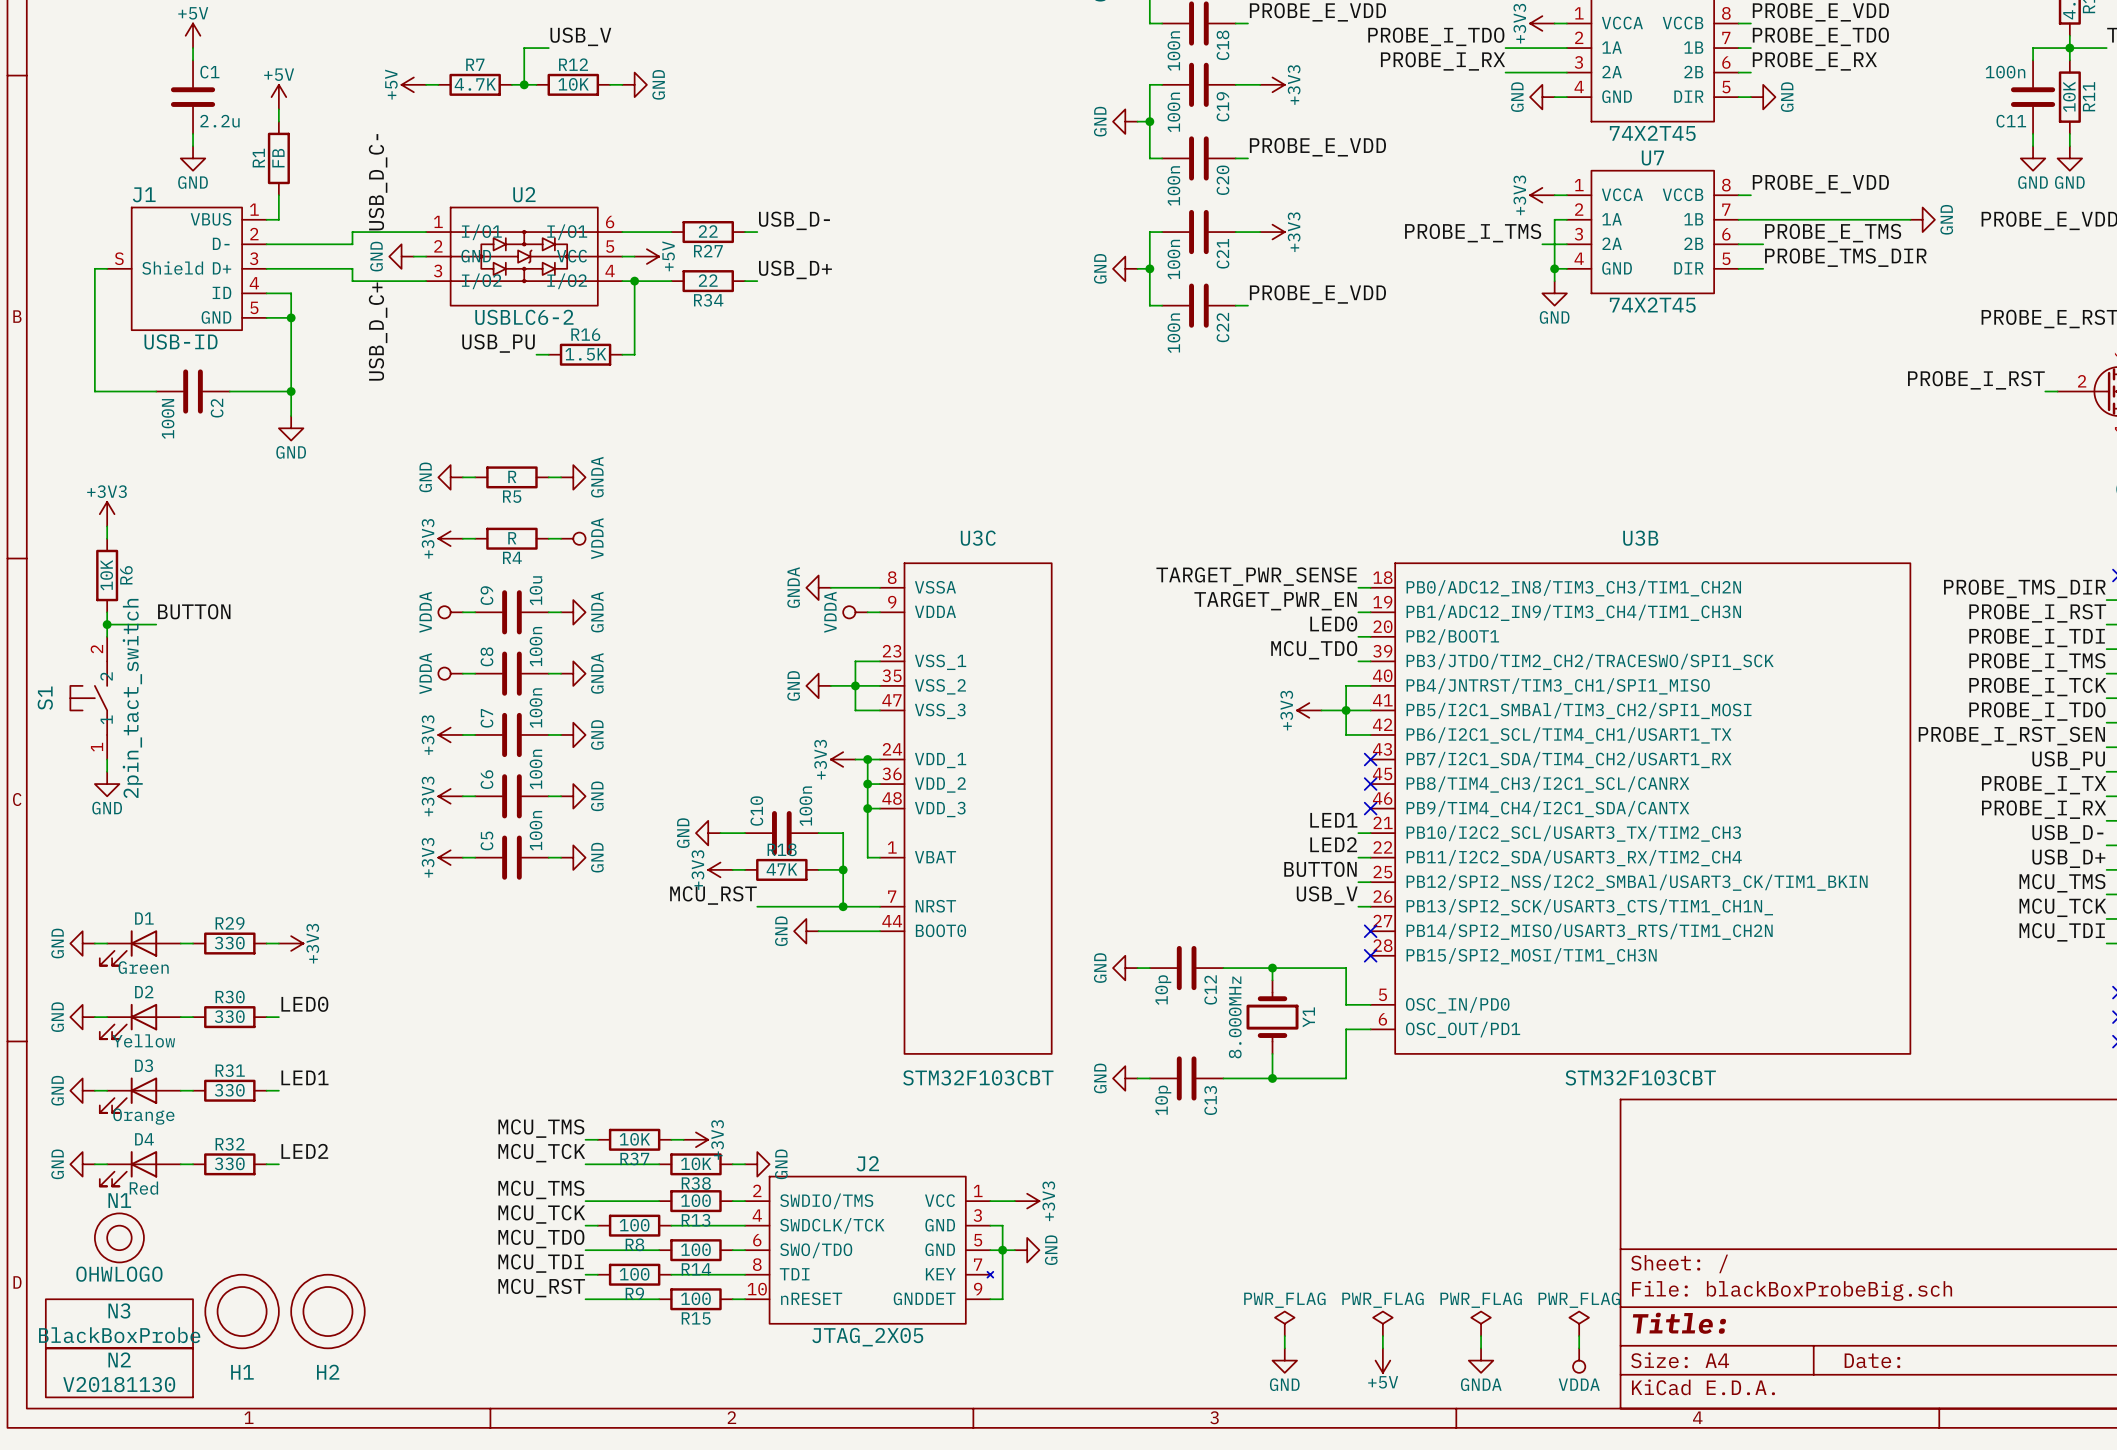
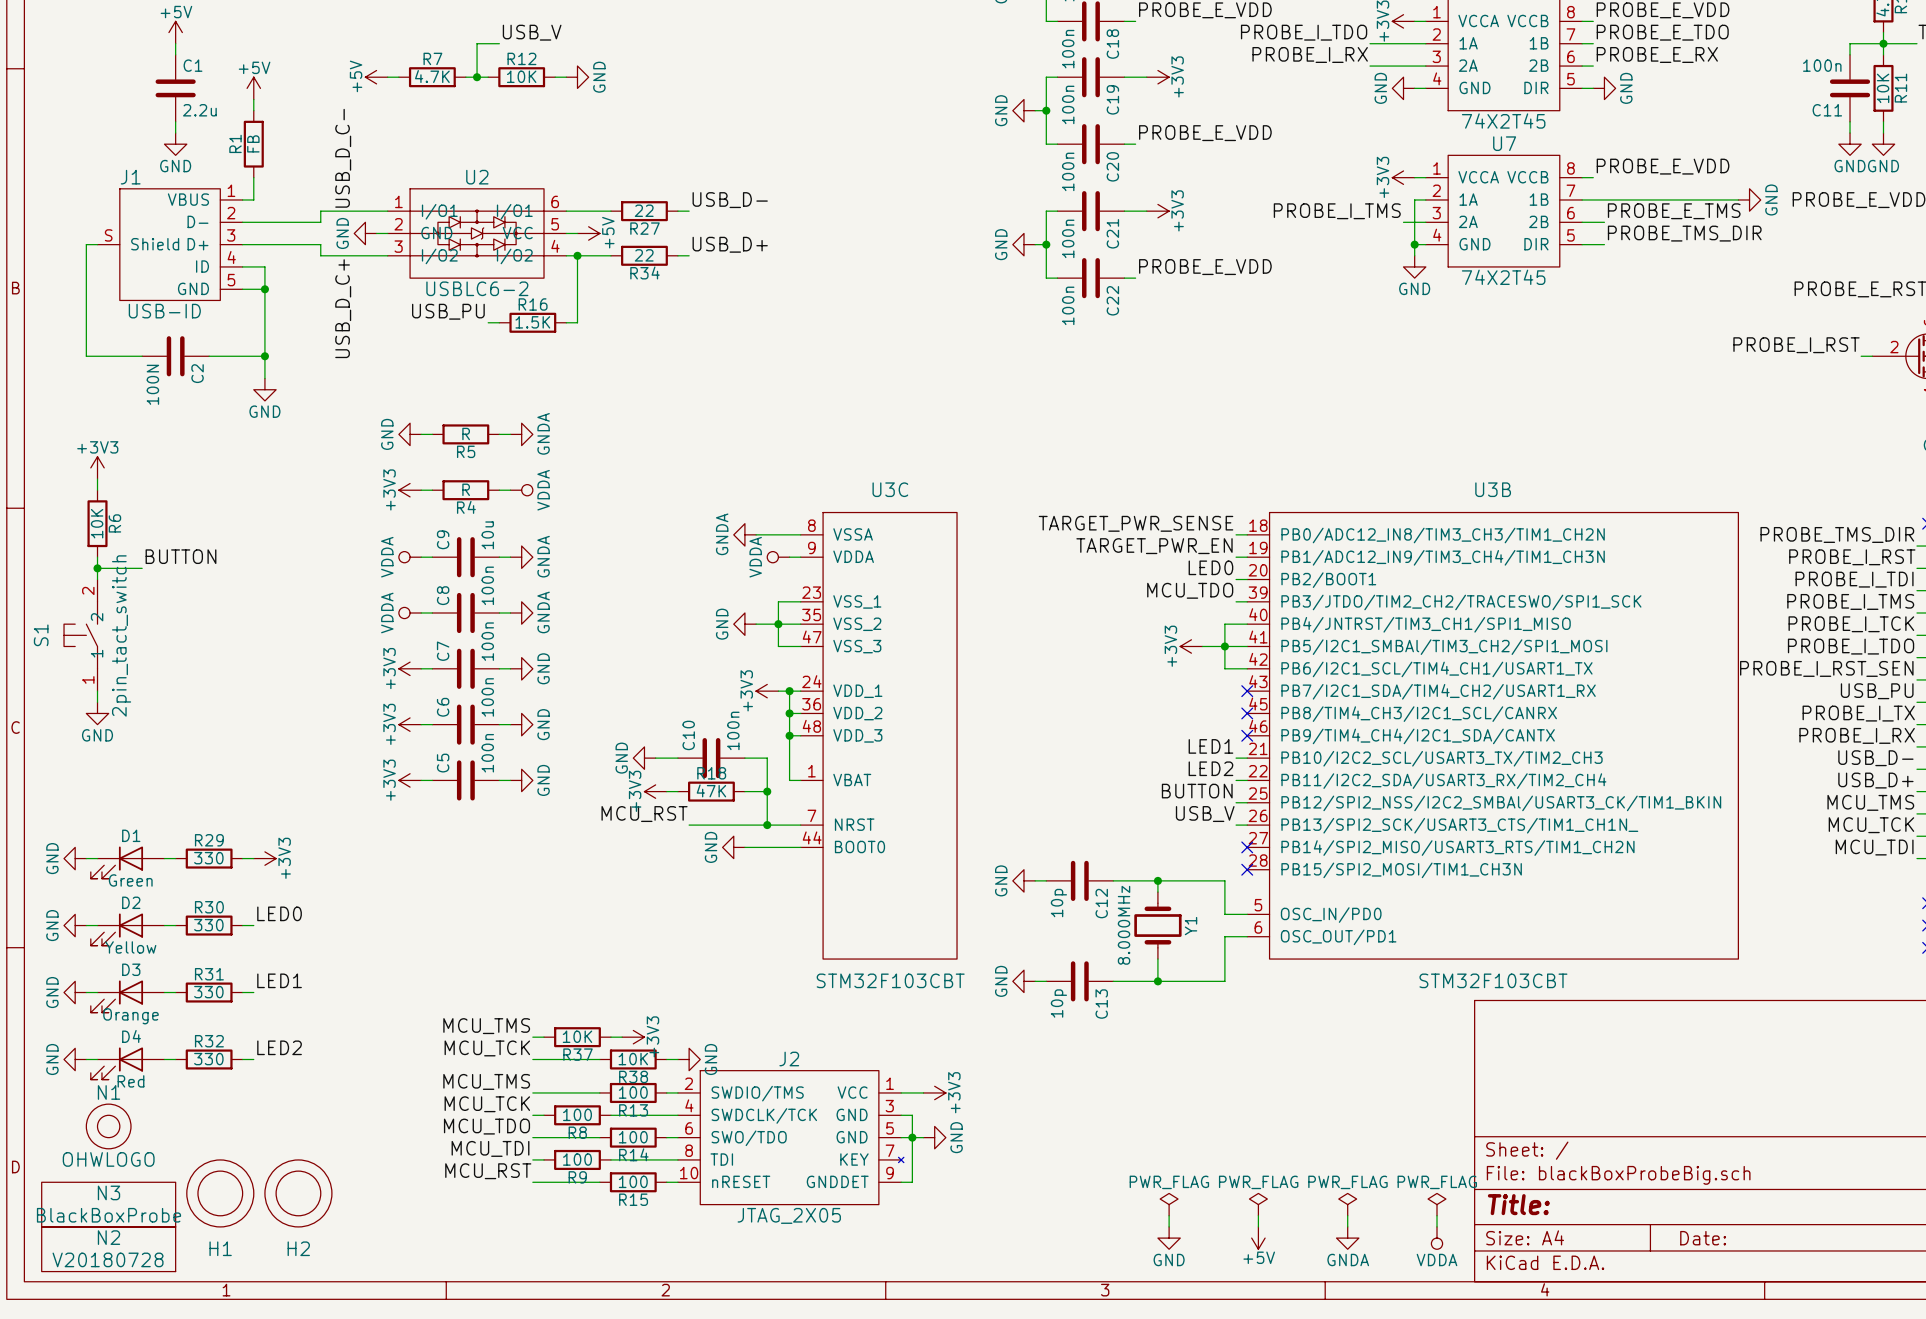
N2 value: V20181130 (119, 1384) -> V20180728 (108, 1259)

